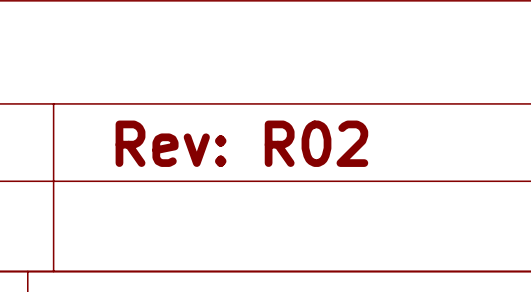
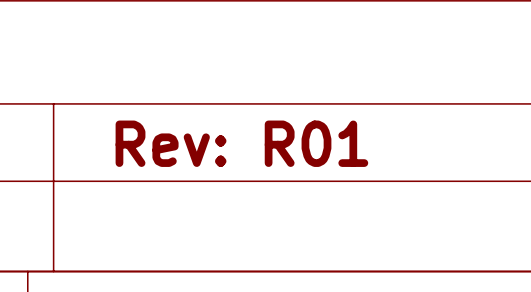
title block: Rev: R02 (241, 143) -> Rev: R01 (241, 143)

